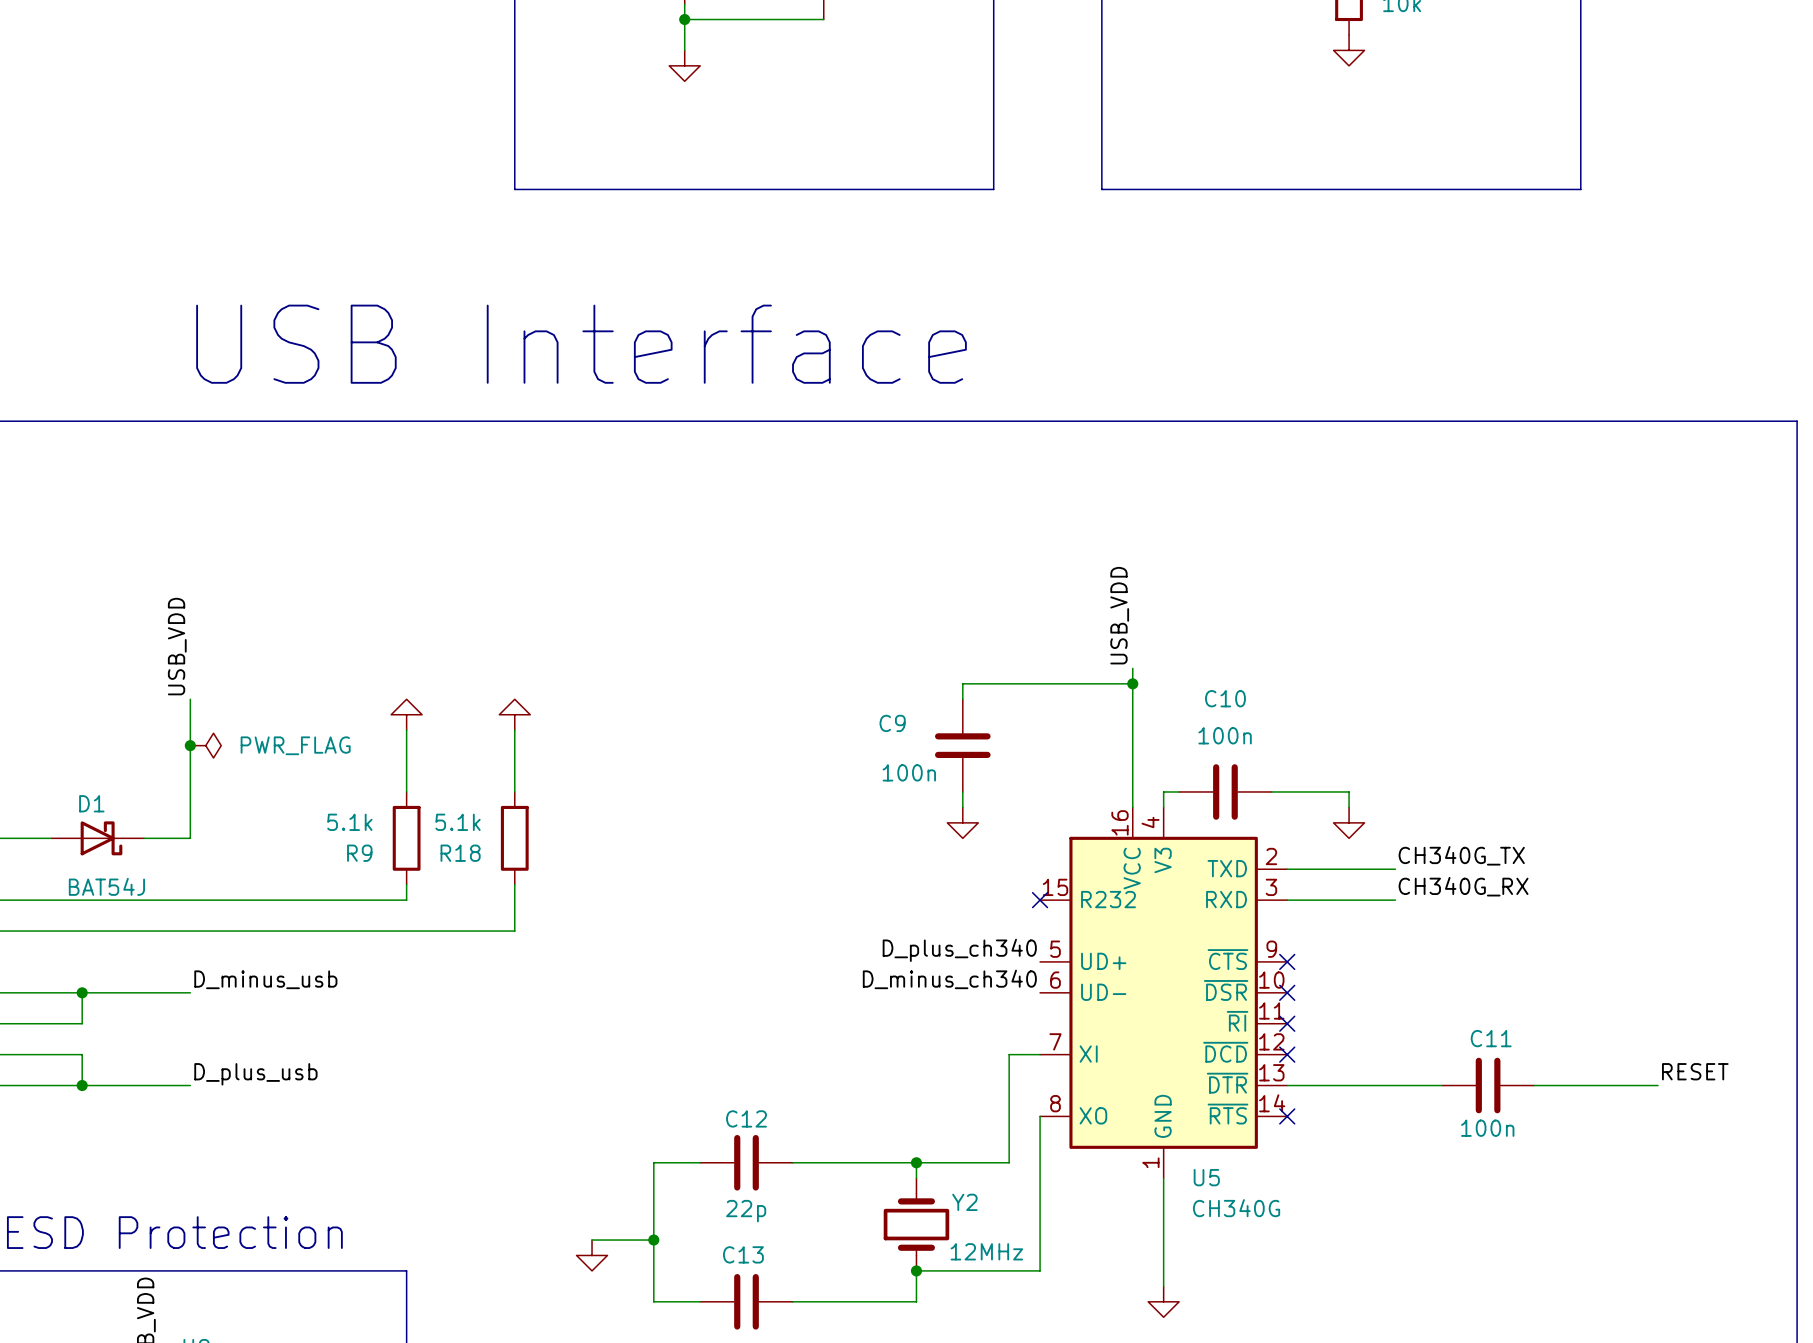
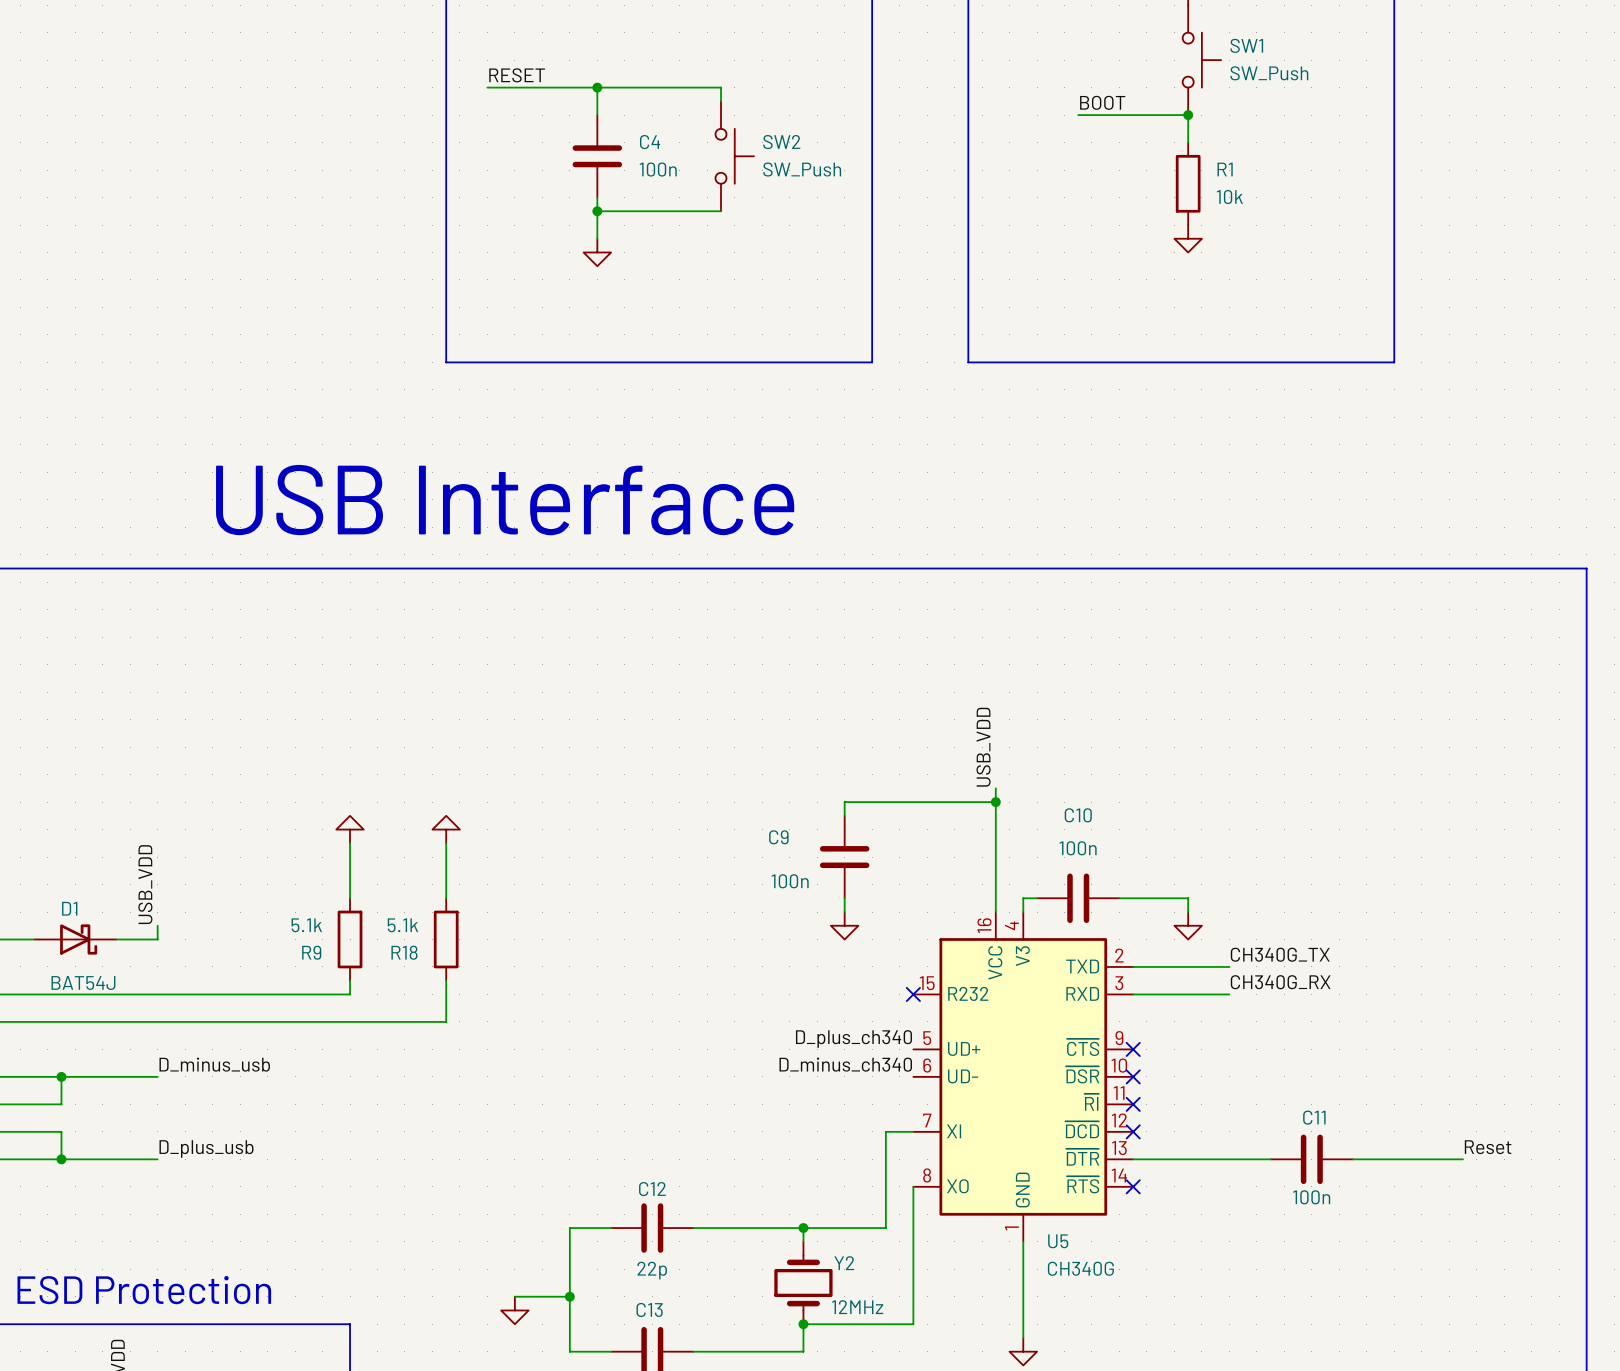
label position: USB_VDD (177, 646) -> USB_VDD (145, 884)
wire: (190, 699) (190, 822) -> none
junction: (190, 745) -> none
power symbol: PWR_FLAG (205, 745) -> none
label: RESET (1695, 1071) -> Reset (1488, 1147)

